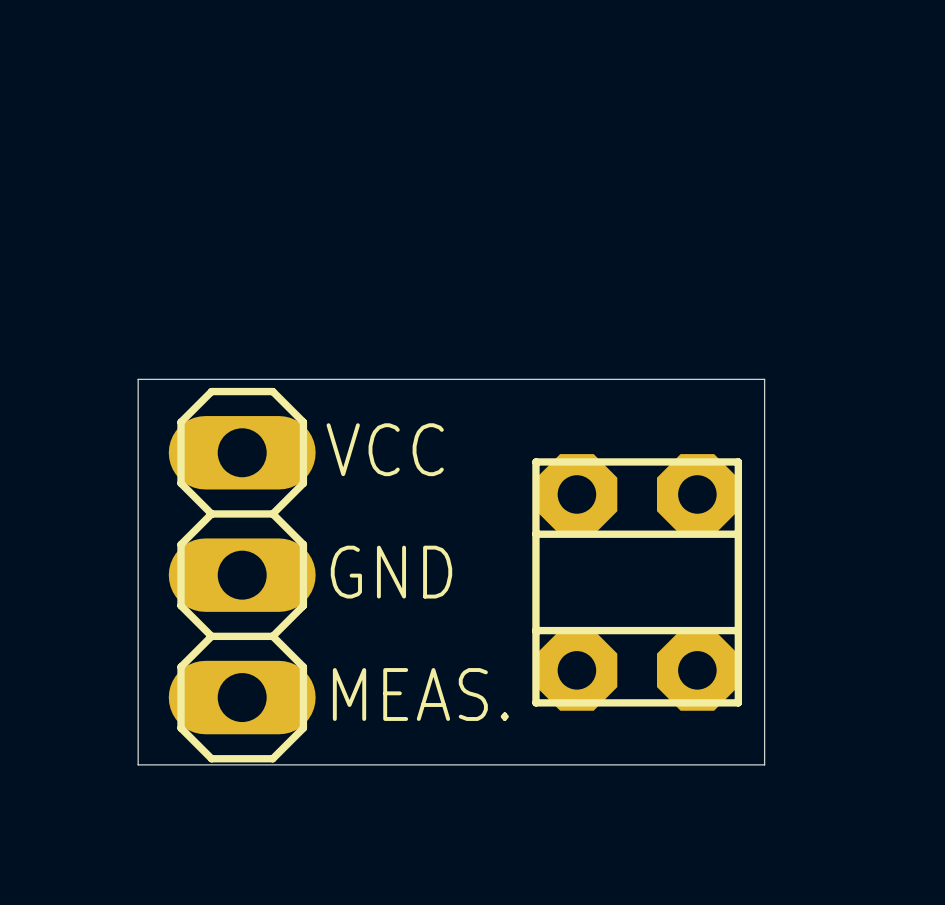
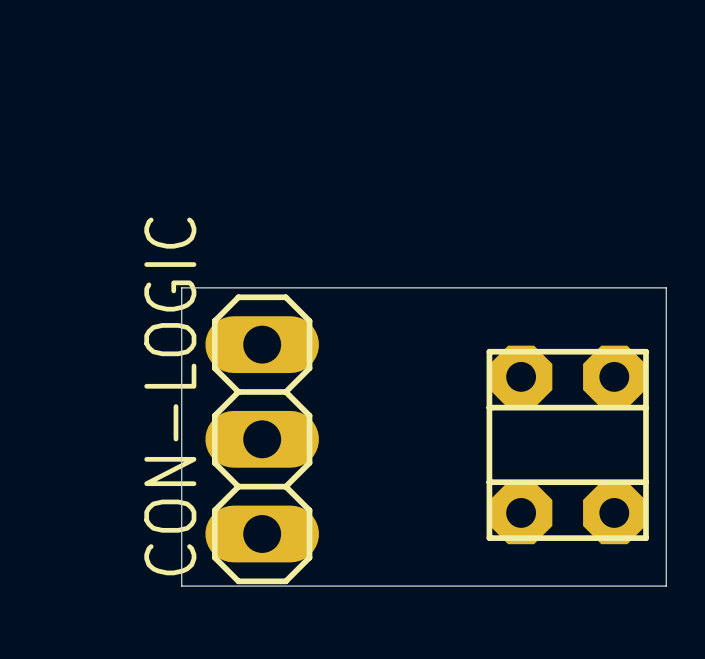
text: VCC (385, 449) -> none
CON-LOGIC name: none -> CON-LOGIC (170, 396)
text: GND (391, 572) -> none
text: MEAS. (420, 694) -> none

